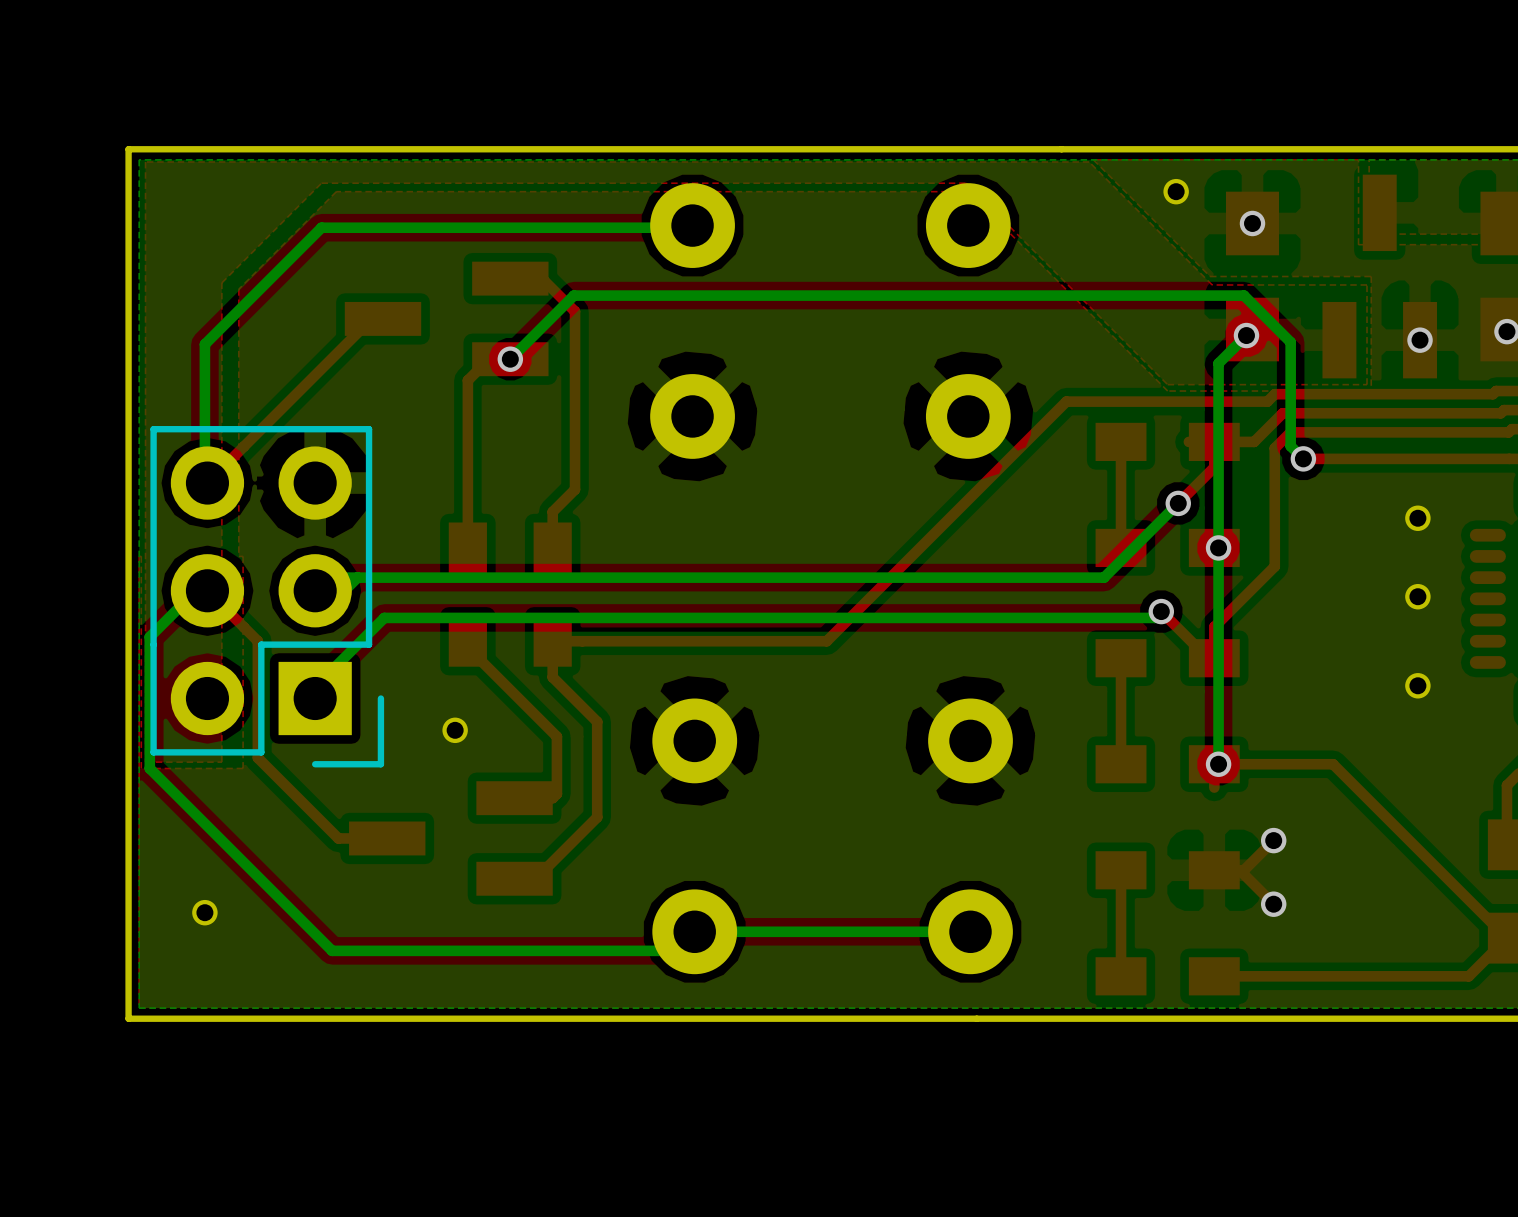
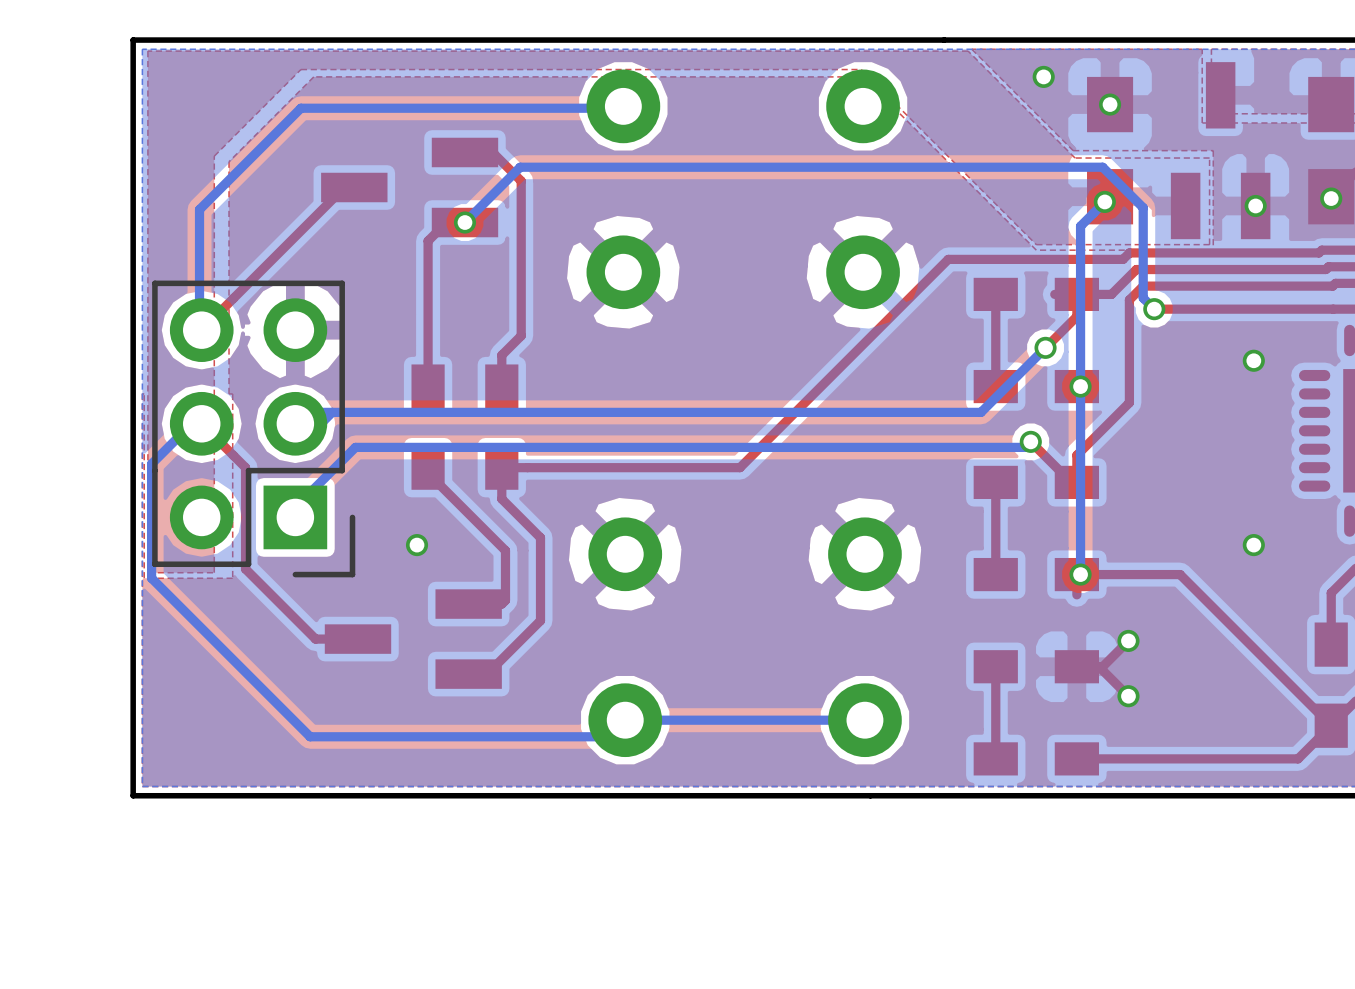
part: (1417, 596) -> none
part position: (1417, 685) -> (1253, 545)
part: (204, 912) -> none

